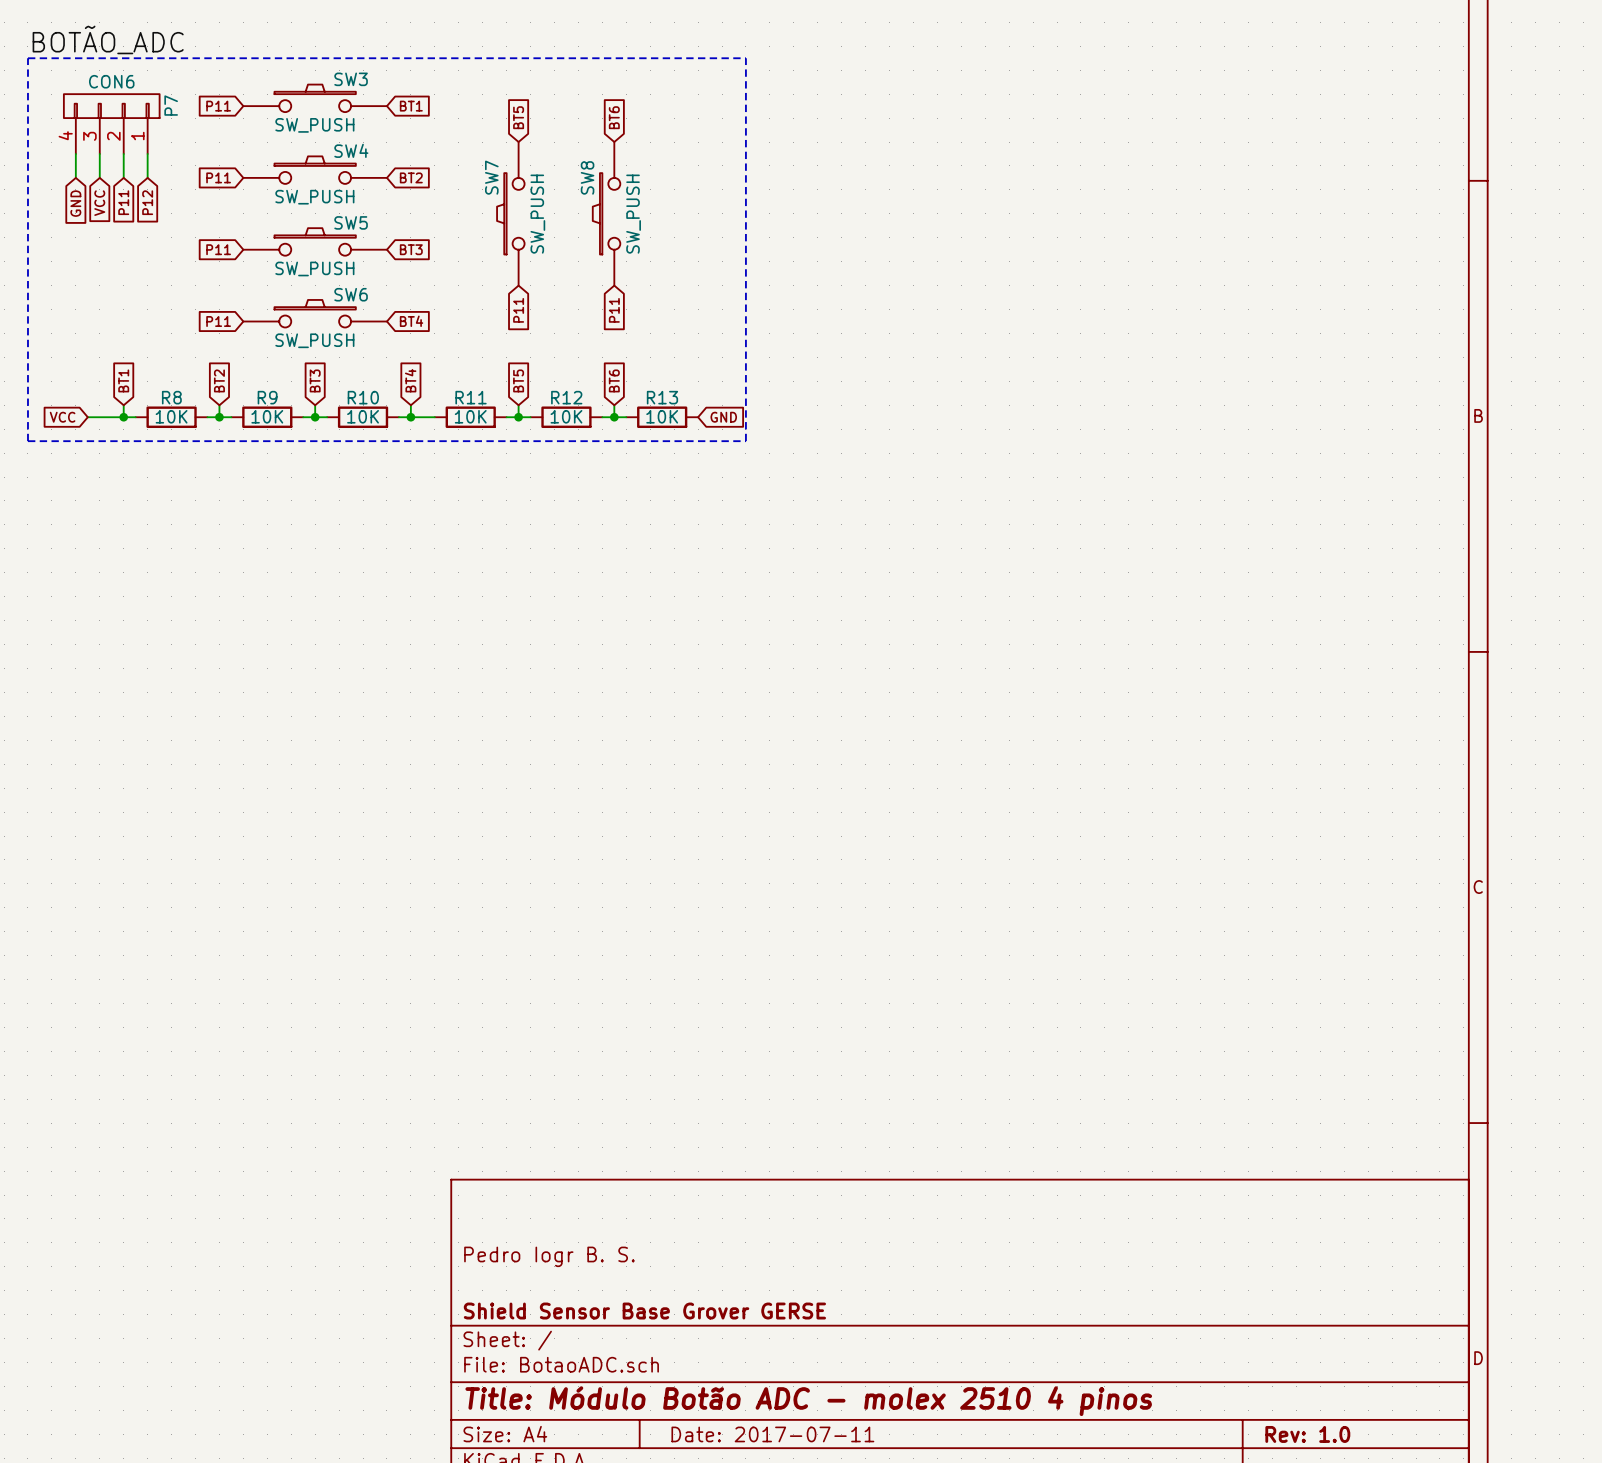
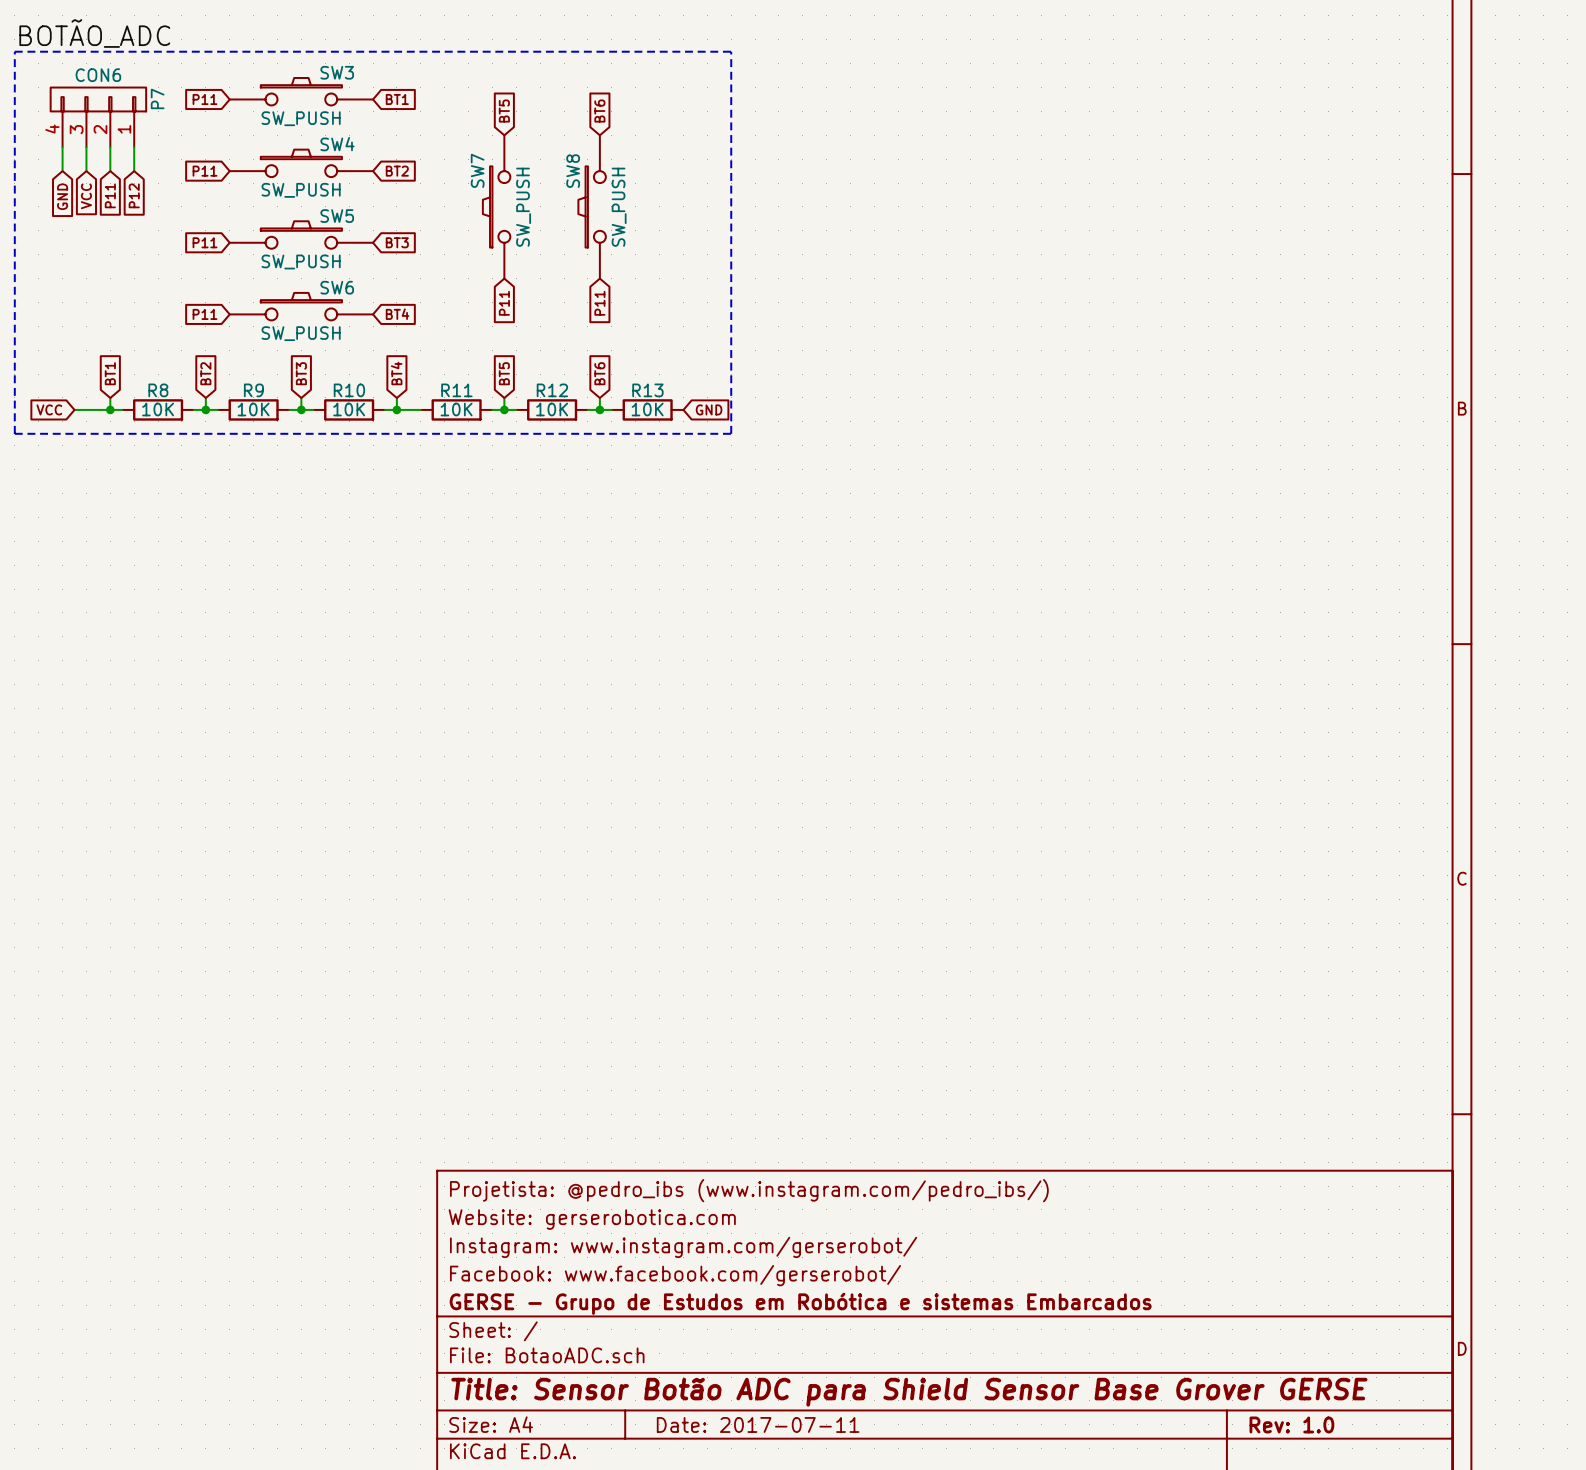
title block: none -> Projetista: @pedro_ibs (www.instagram.com/pedro_ibs/) (749, 1190)
title block: none -> Website: gerserobotica.com (592, 1219)
title block: Pedro Iogr B. S. (549, 1256) -> Instagram: www.instagram.com/gerserobot/ (683, 1247)
title block: none -> Facebook: www.facebook.com/gerserobot/ (675, 1275)
title block: Shield Sensor Base Grover GERSE (644, 1311) -> GERSE - Grupo de Estudos em Robótica e sistemas Embarcados (800, 1303)
title block: Title: Módulo Botão ADC - molex 2510 4 pinos (808, 1401) -> Title: Sensor Botão ADC para Shield Sensor Base Grover GERSE (909, 1392)

